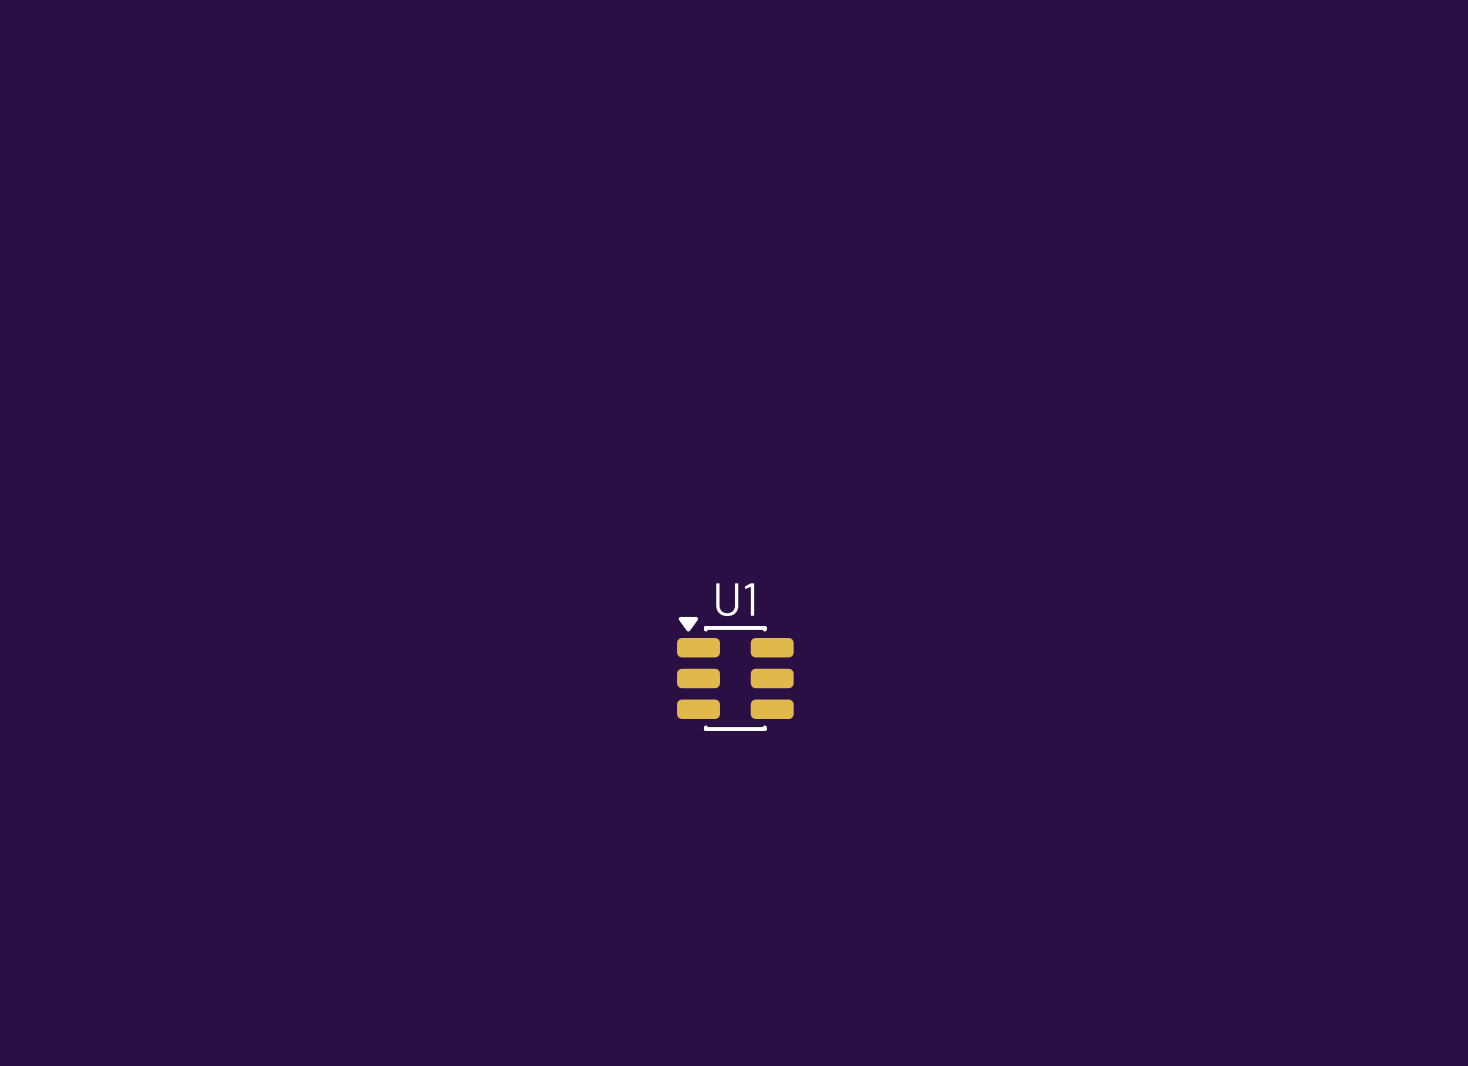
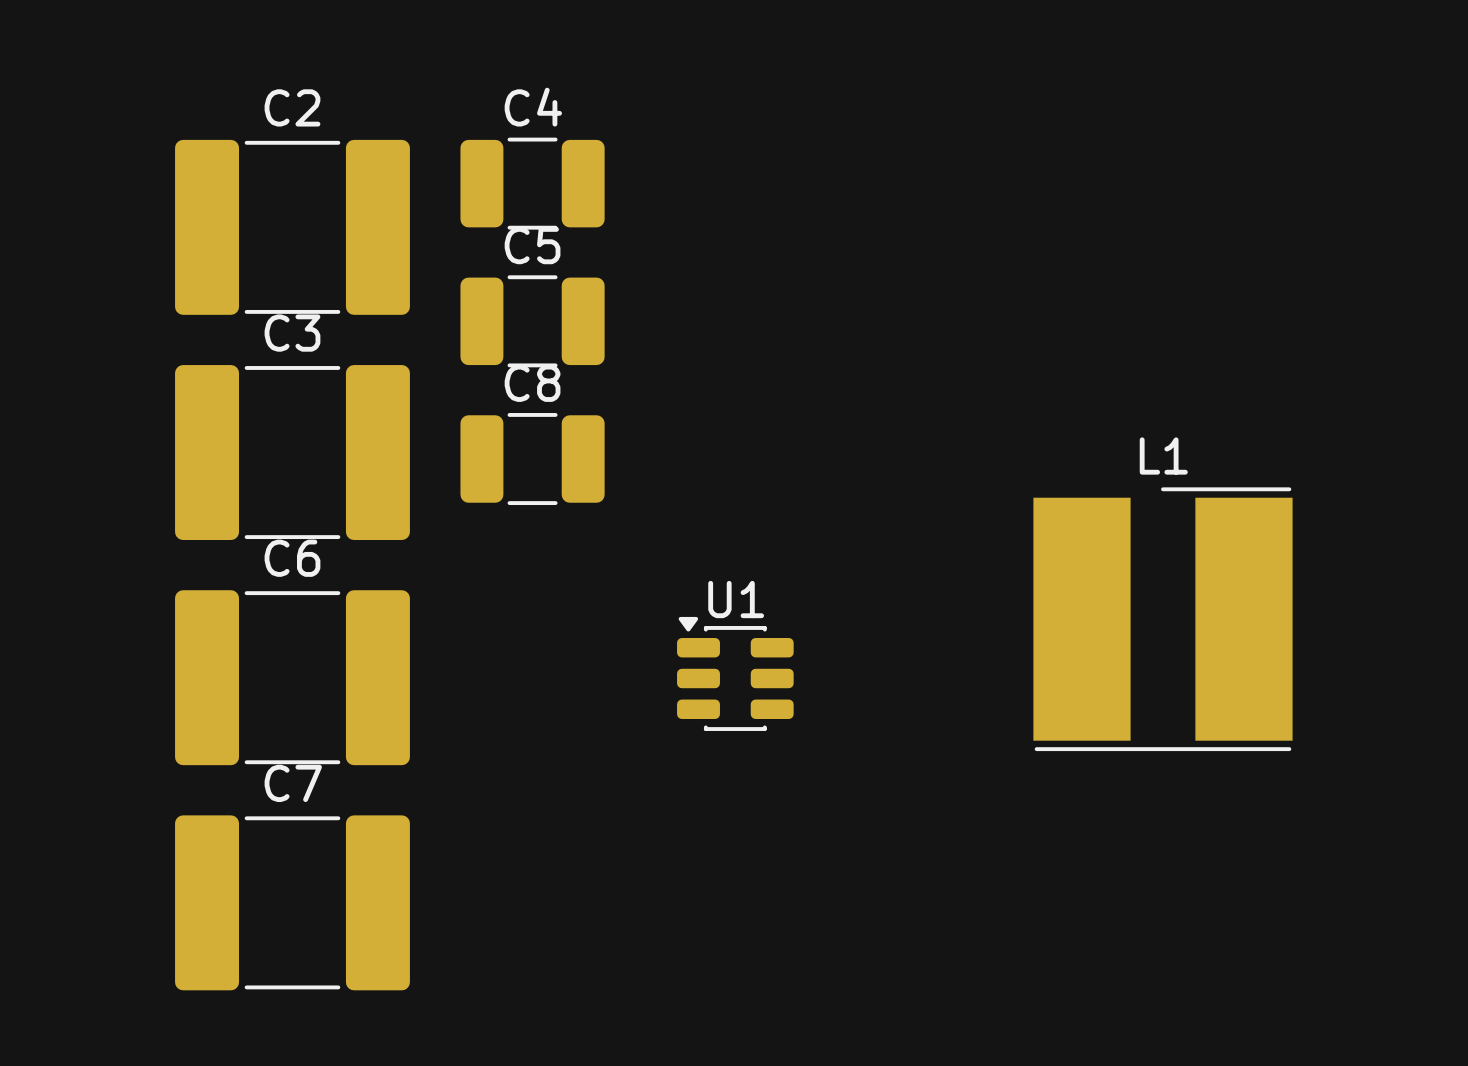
C4: none -> (532, 183)
C2: none -> (292, 227)
C5: none -> (532, 321)
C3: none -> (292, 452)
C8: none -> (532, 459)
L1: none -> (1162, 619)
C6: none -> (292, 677)
C7: none -> (292, 902)

